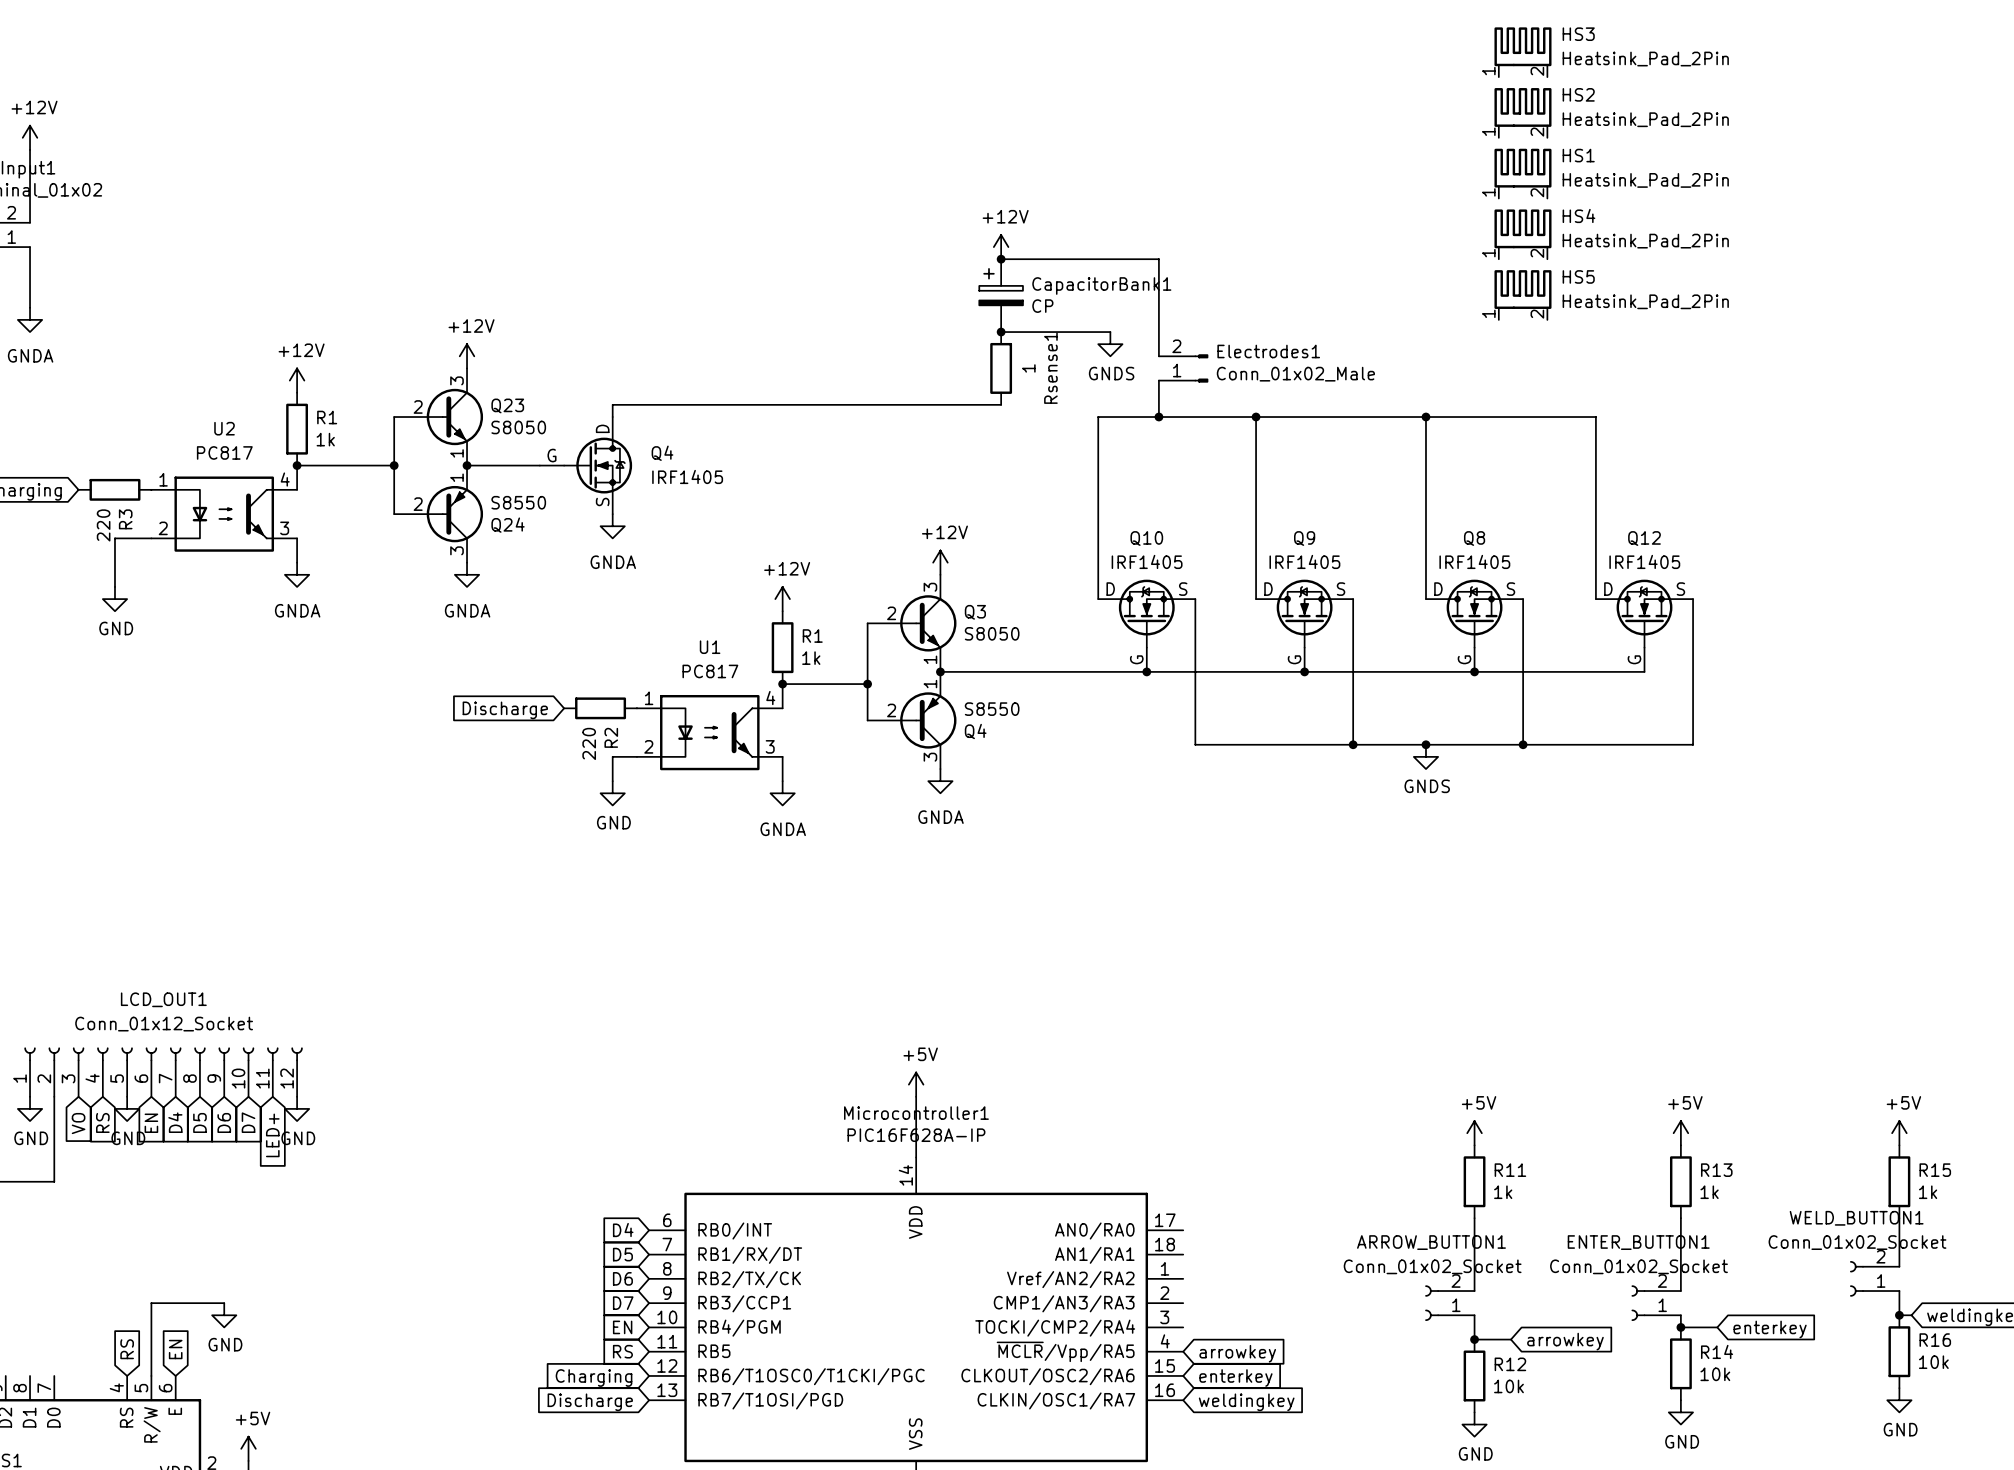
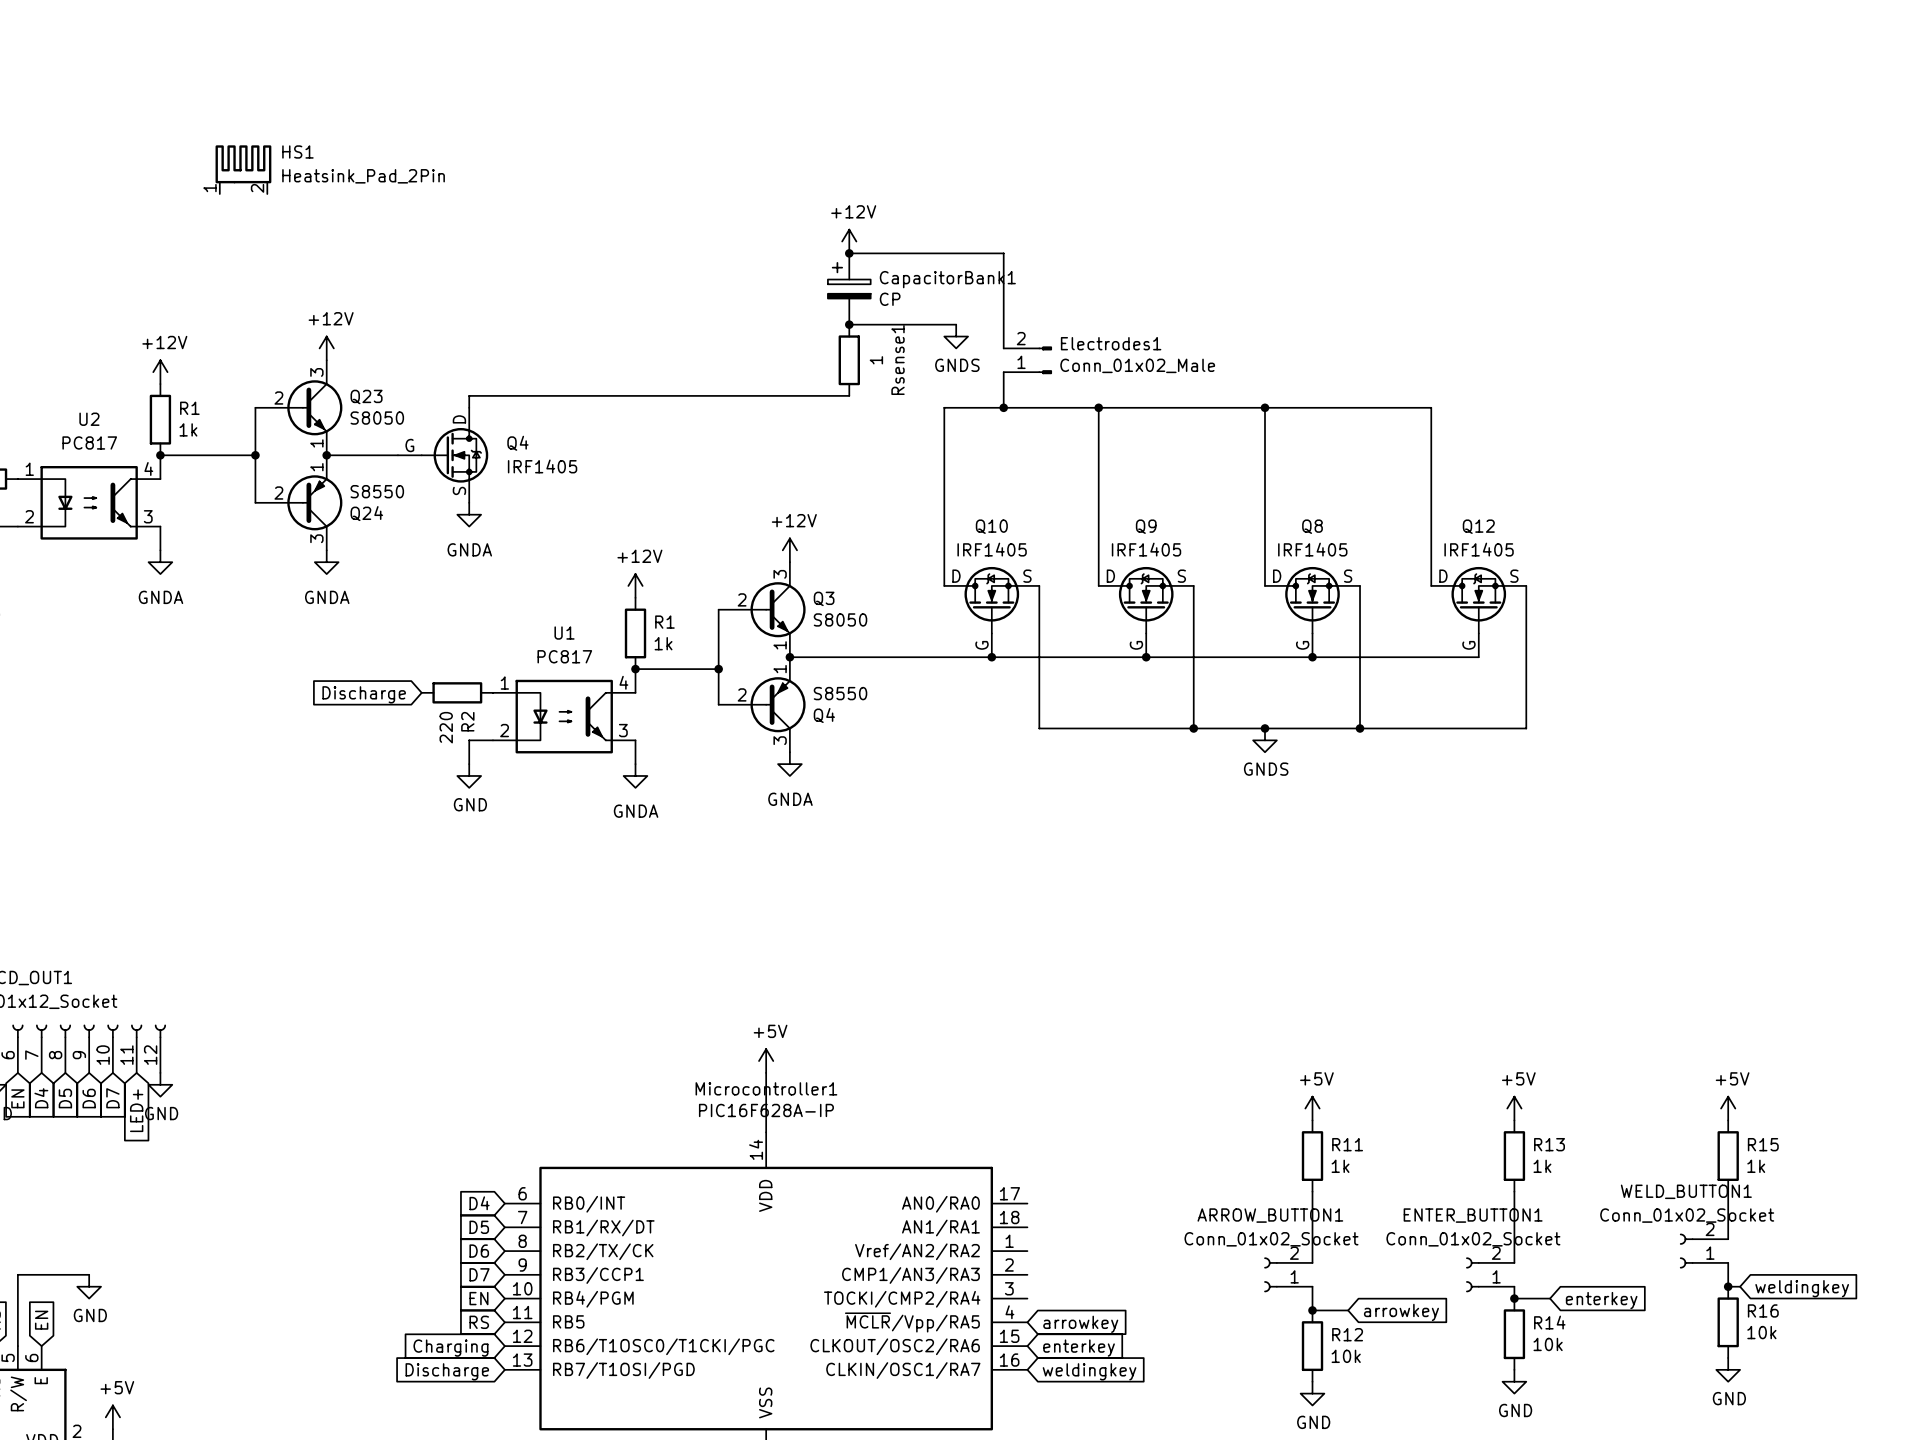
HS3: Heatsink_Pad_2Pin (1522, 52) -> none
HS2: Heatsink_Pad_2Pin (1522, 112) -> none
HS1 position: (1522, 173) -> (243, 169)
HS4: Heatsink_Pad_2Pin (1522, 234) -> none
HS5: Heatsink_Pad_2Pin (1522, 295) -> none

